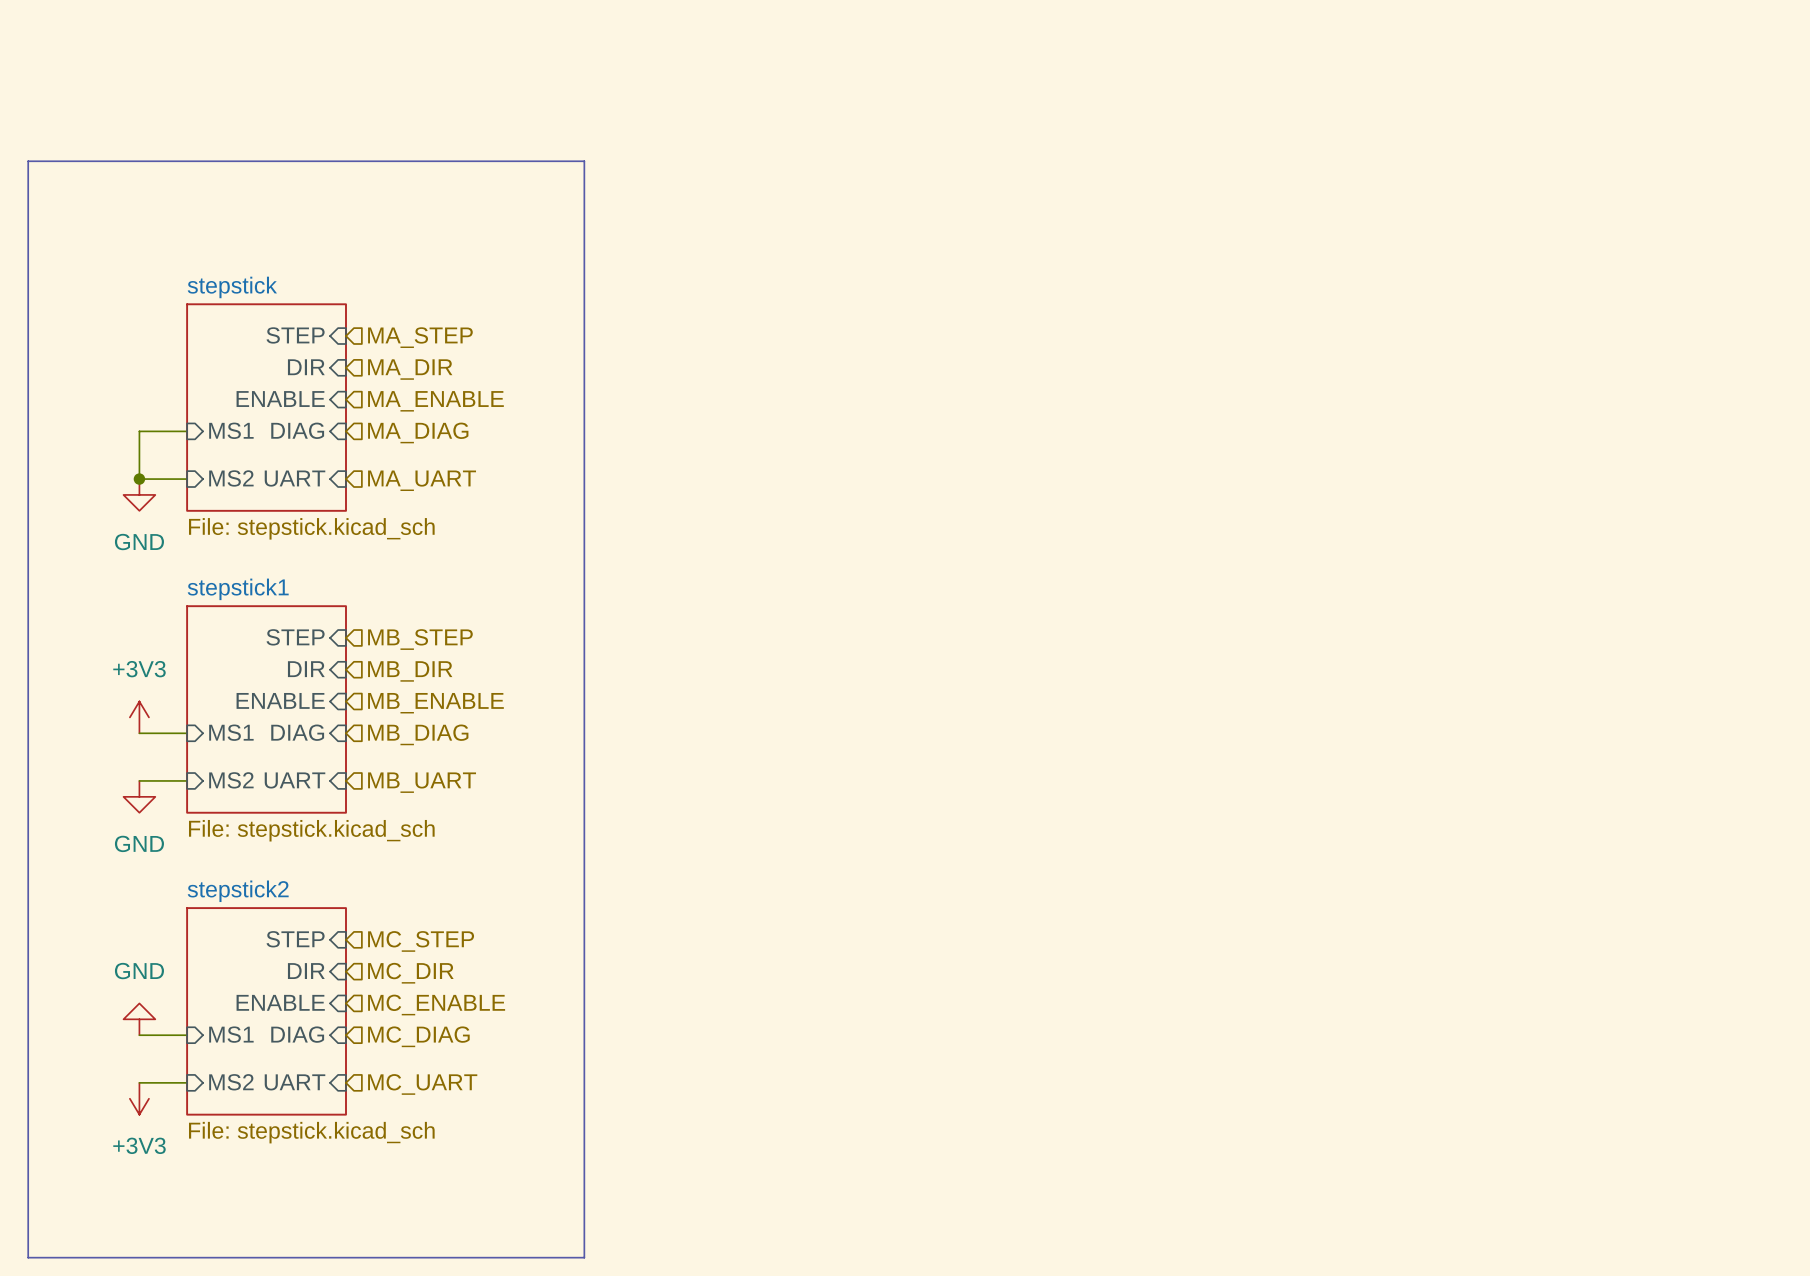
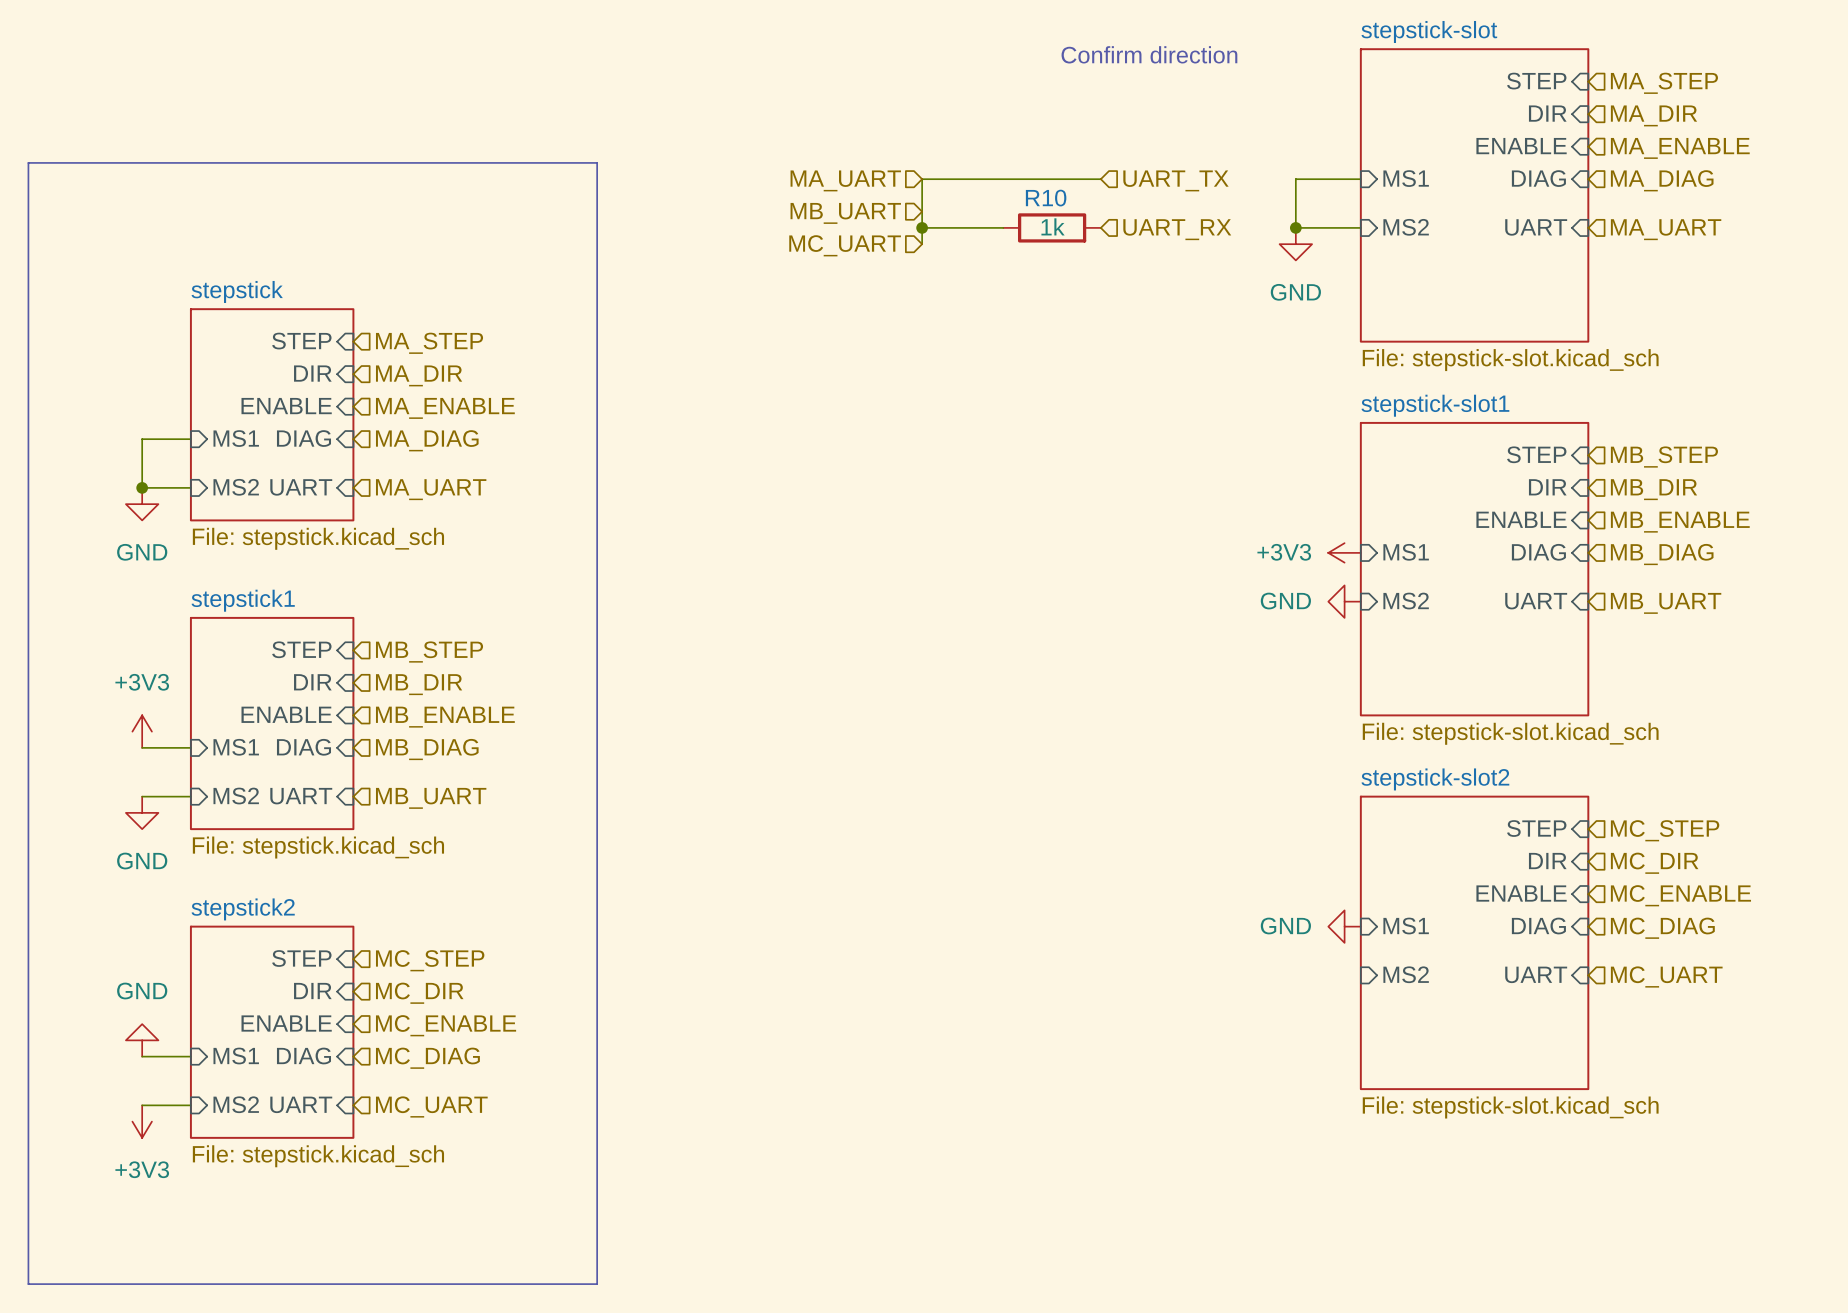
text: none -> Confirm direction (1149, 54)
sheet pin: none -> STEP (1536, 81)
hierarchical label: none -> MA_STEP (1664, 83)
sheet pin: none -> DIR (1547, 113)
hierarchical label: none -> MA_DIR (1654, 115)
sheet pin: none -> ENABLE (1521, 146)
hierarchical label: none -> MA_ENABLE (1680, 148)
sheet pin: none -> MS1 (1406, 178)
sheet pin: none -> DIAG (1538, 178)
wire: none -> (1100, 179) (922, 179) (922, 244)
wire: none -> (1360, 179) (1295, 179) (1295, 227) (1360, 227)
hierarchical label: none -> MA_UART (845, 180)
hierarchical label: none -> UART_TX (1175, 180)
hierarchical label: none -> MA_DIAG (1662, 180)
sheet stepstick-slot: none -> File: stepstick-slot.kicad_sch (1474, 195)
hierarchical label: none -> MB_UART (845, 213)
wire: none -> (922, 227) (1003, 227)
junction: none -> (922, 227)
R10: none -> 1k (1052, 227)
junction: none -> (1295, 227)
sheet pin: none -> MS2 (1406, 227)
sheet pin: none -> UART (1536, 227)
hierarchical label: none -> UART_RX (1177, 229)
hierarchical label: none -> MA_UART (1666, 229)
power symbol: none -> GND (1295, 244)
hierarchical label: none -> MC_UART (845, 245)
sheet pin: none -> STEP (1536, 454)
hierarchical label: none -> MB_STEP (1664, 457)
sheet pin: none -> DIR (1547, 487)
hierarchical label: none -> MB_DIR (1654, 489)
sheet pin: none -> ENABLE (1521, 519)
hierarchical label: none -> MB_ENABLE (1680, 522)
power symbol: none -> +3V3 (1344, 552)
sheet pin: none -> MS1 (1406, 552)
sheet pin: none -> DIAG (1538, 552)
hierarchical label: none -> MB_DIAG (1662, 554)
sheet stepstick-slot1: none -> File: stepstick-slot.kicad_sch (1474, 569)
sheet pin: none -> MS2 (1406, 601)
sheet pin: none -> UART (1536, 601)
power symbol: none -> GND (1344, 601)
hierarchical label: none -> MB_UART (1666, 603)
sheet pin: none -> STEP (1536, 828)
hierarchical label: none -> MC_STEP (1665, 830)
sheet pin: none -> DIR (1547, 861)
hierarchical label: none -> MC_DIR (1654, 863)
sheet pin: none -> ENABLE (1521, 893)
hierarchical label: none -> MC_ENABLE (1680, 895)
sheet pin: none -> MS1 (1406, 926)
sheet pin: none -> DIAG (1538, 926)
power symbol: none -> GND (1344, 926)
hierarchical label: none -> MC_DIAG (1662, 928)
sheet stepstick-slot2: none -> File: stepstick-slot.kicad_sch (1474, 942)
sheet pin: none -> MS2 (1406, 974)
sheet pin: none -> UART (1536, 974)
hierarchical label: none -> MC_UART (1666, 976)

